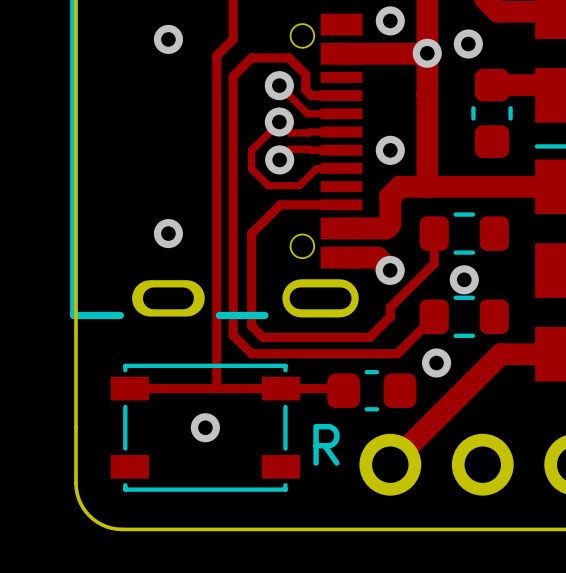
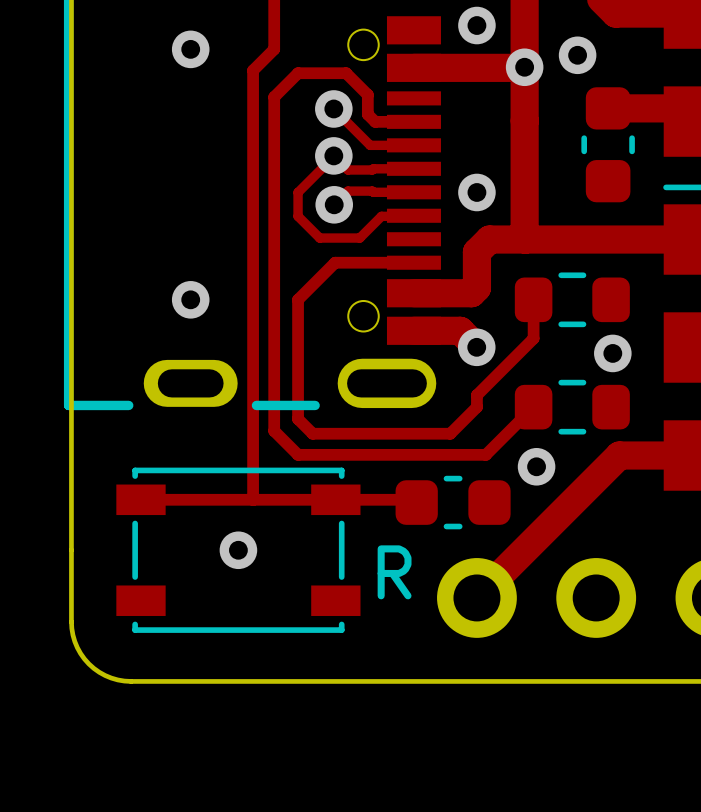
via position: (464, 279) -> (612, 353)

